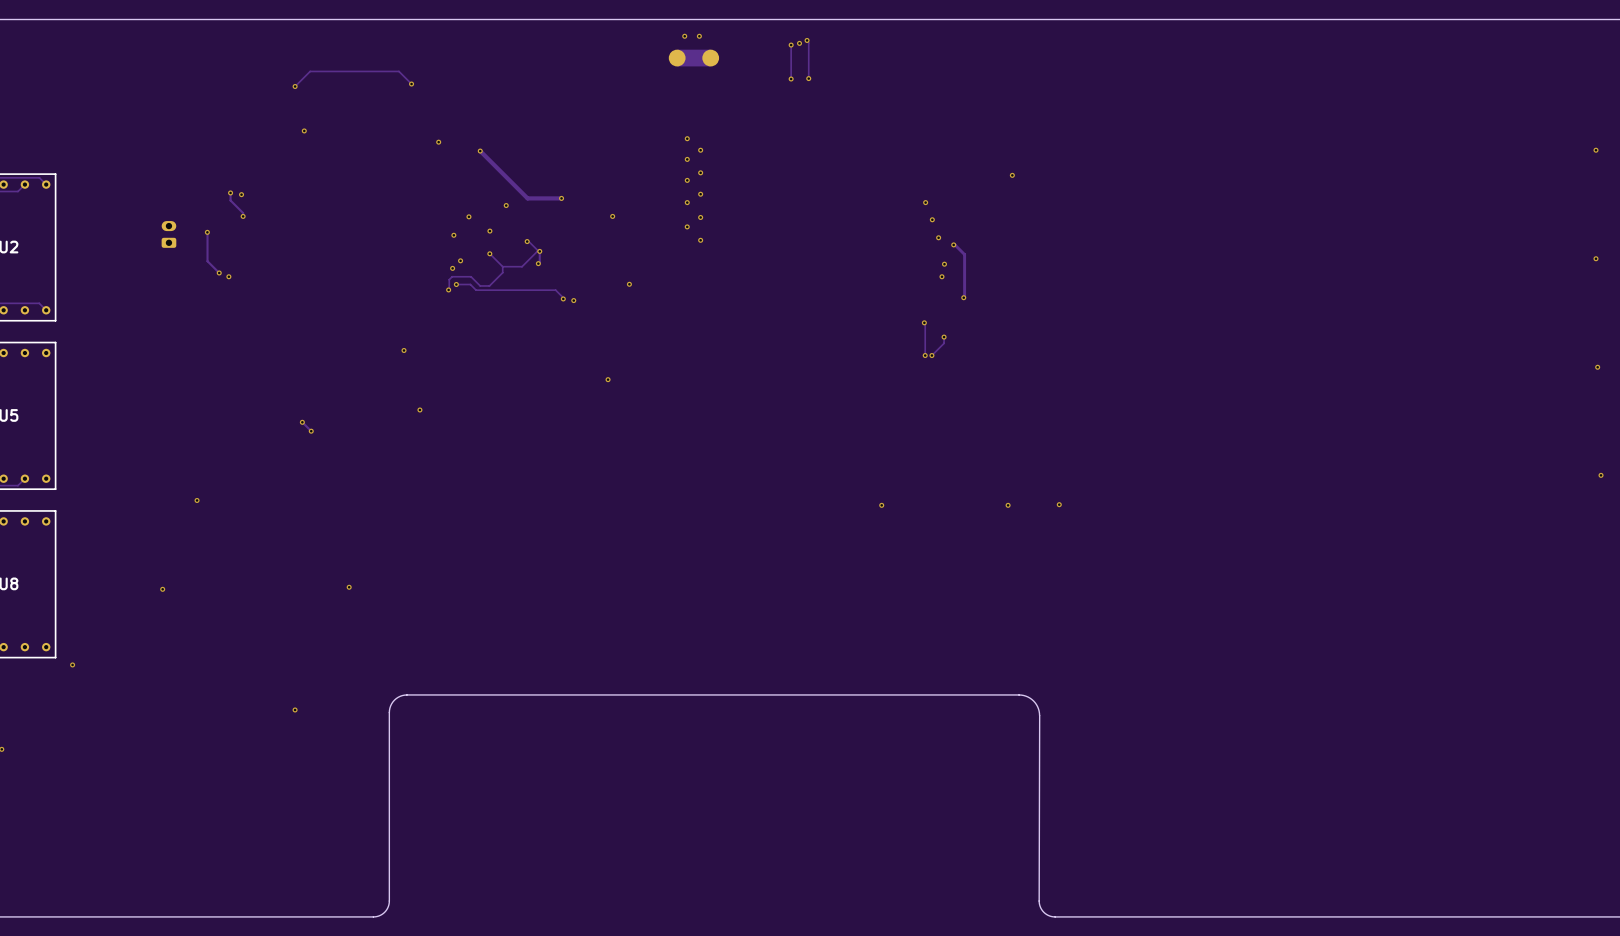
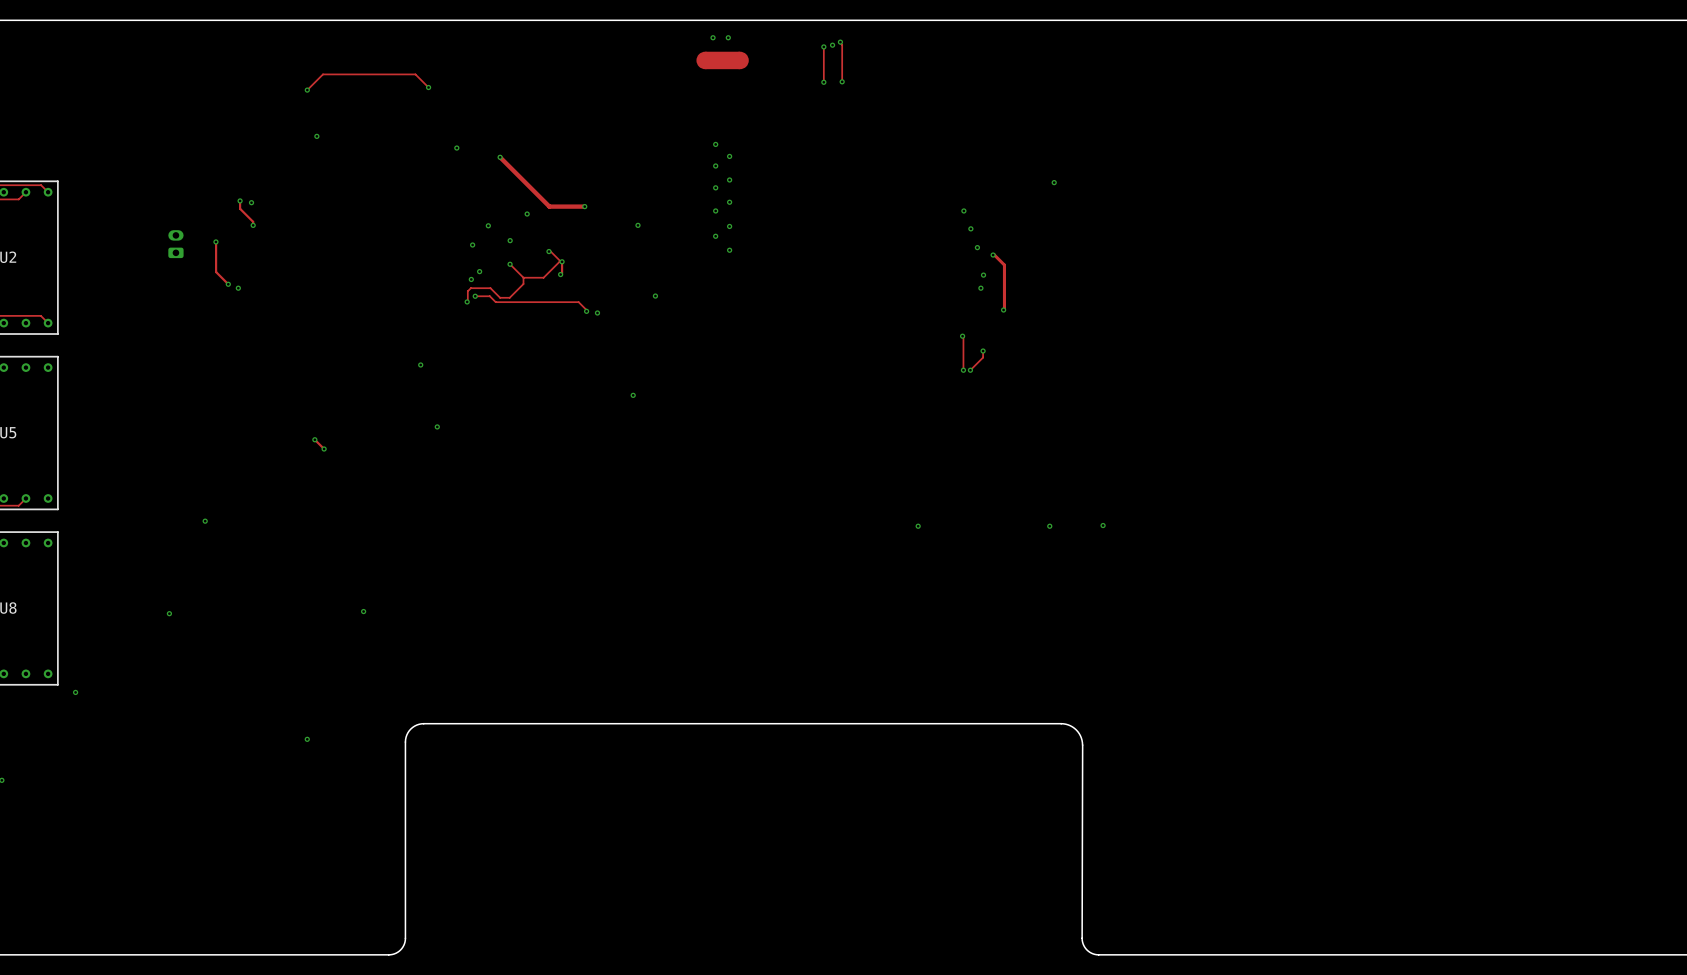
via: (1595, 150) -> none
via: (1595, 258) -> none
via: (1597, 367) -> none
via: (1601, 475) -> none

